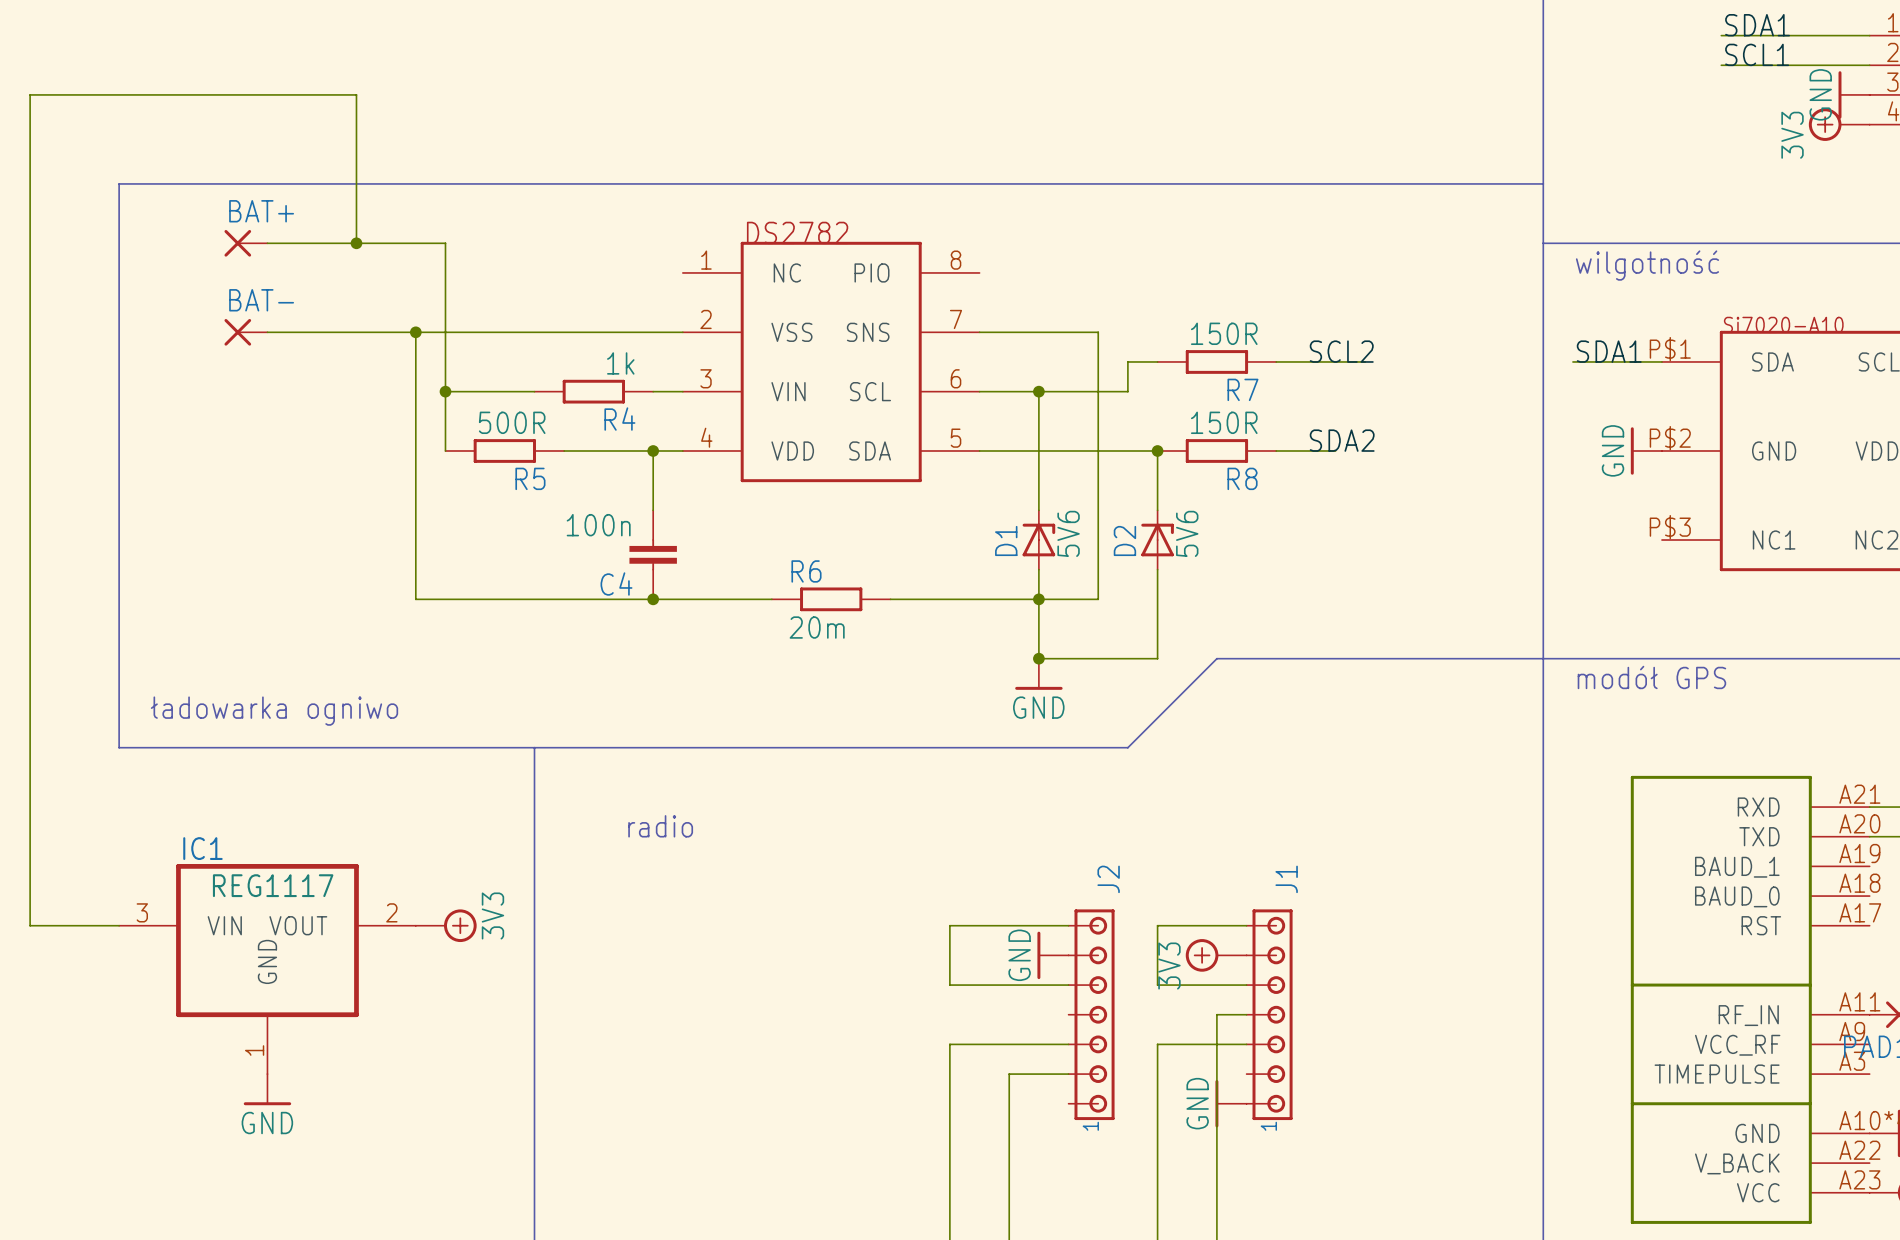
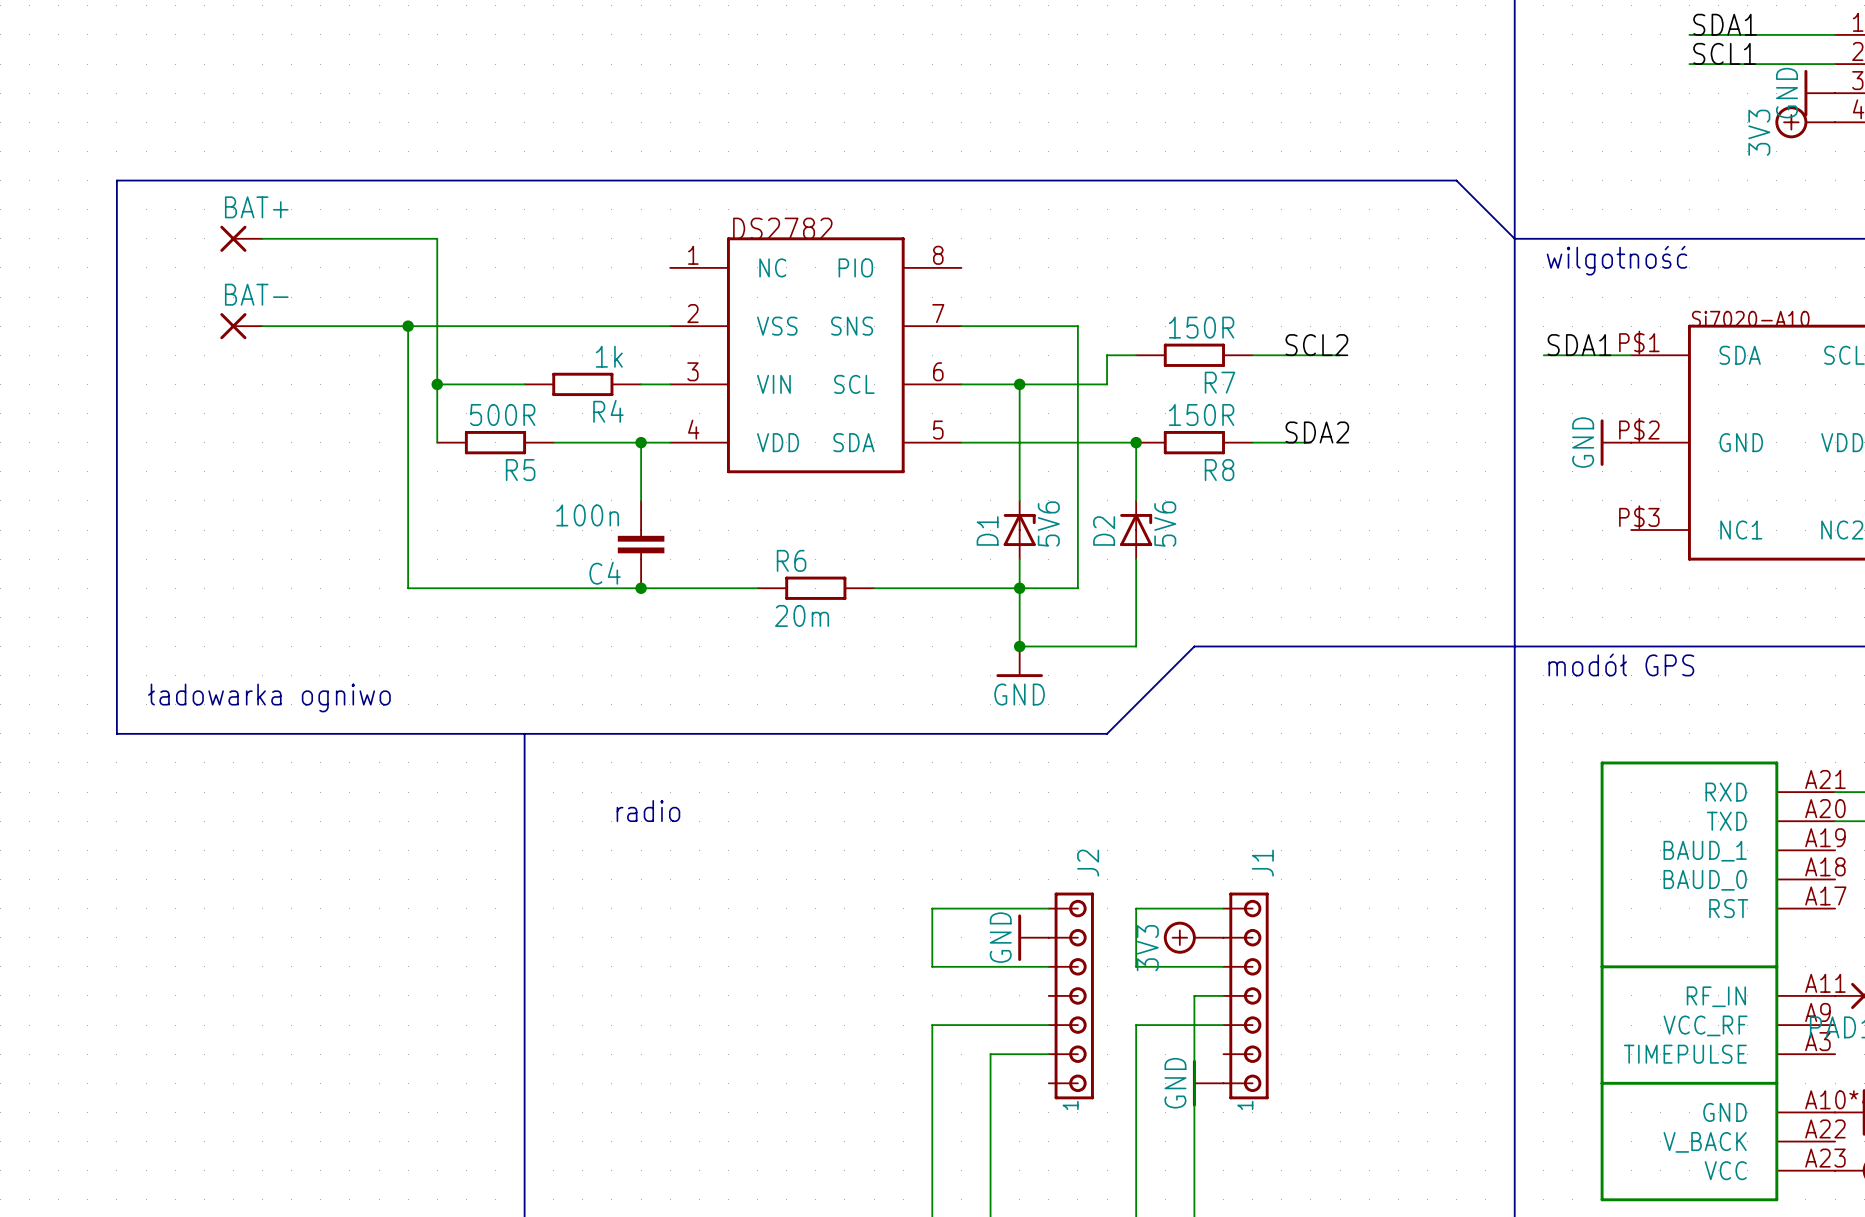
bus: (1483, 183) (1543, 183) -> (1456, 180) (1514, 238)
wire: (356, 243) (356, 94) (30, 94) (30, 925) (119, 925) -> none
junction: (356, 243) -> none
power symbol: 3V3 (446, 925) -> none
IC1: REG1117 (267, 969) -> none
power symbol: GND (267, 1089) -> none

